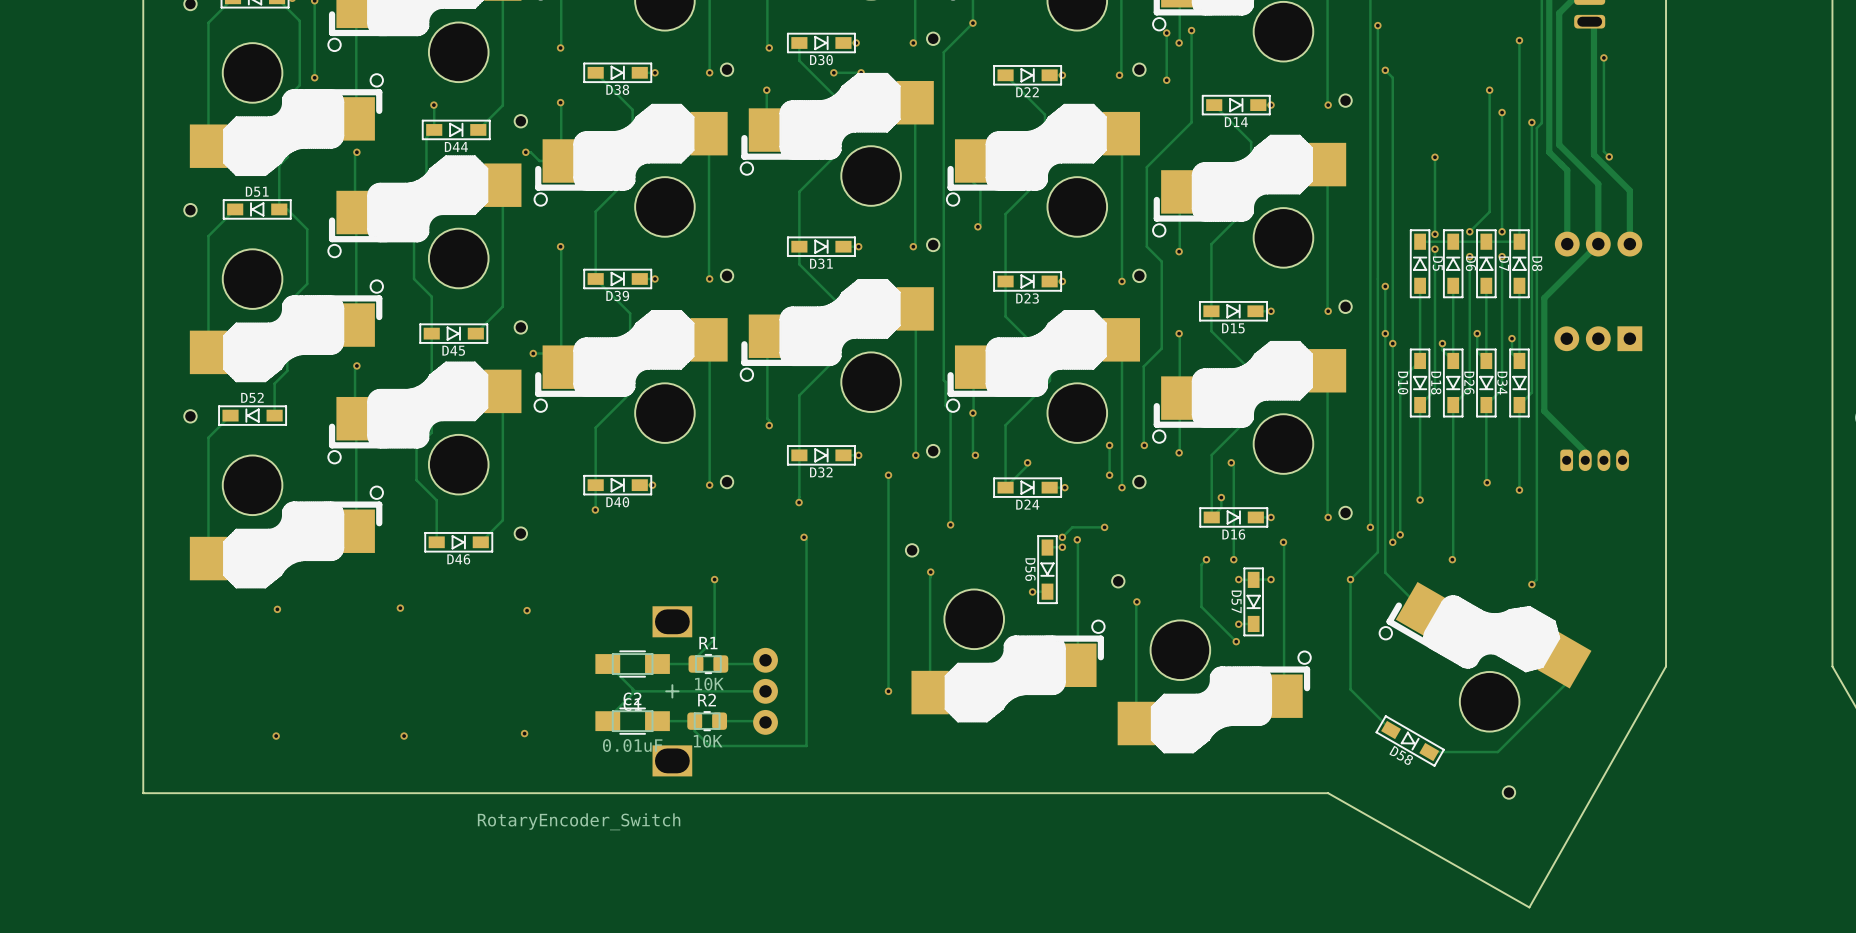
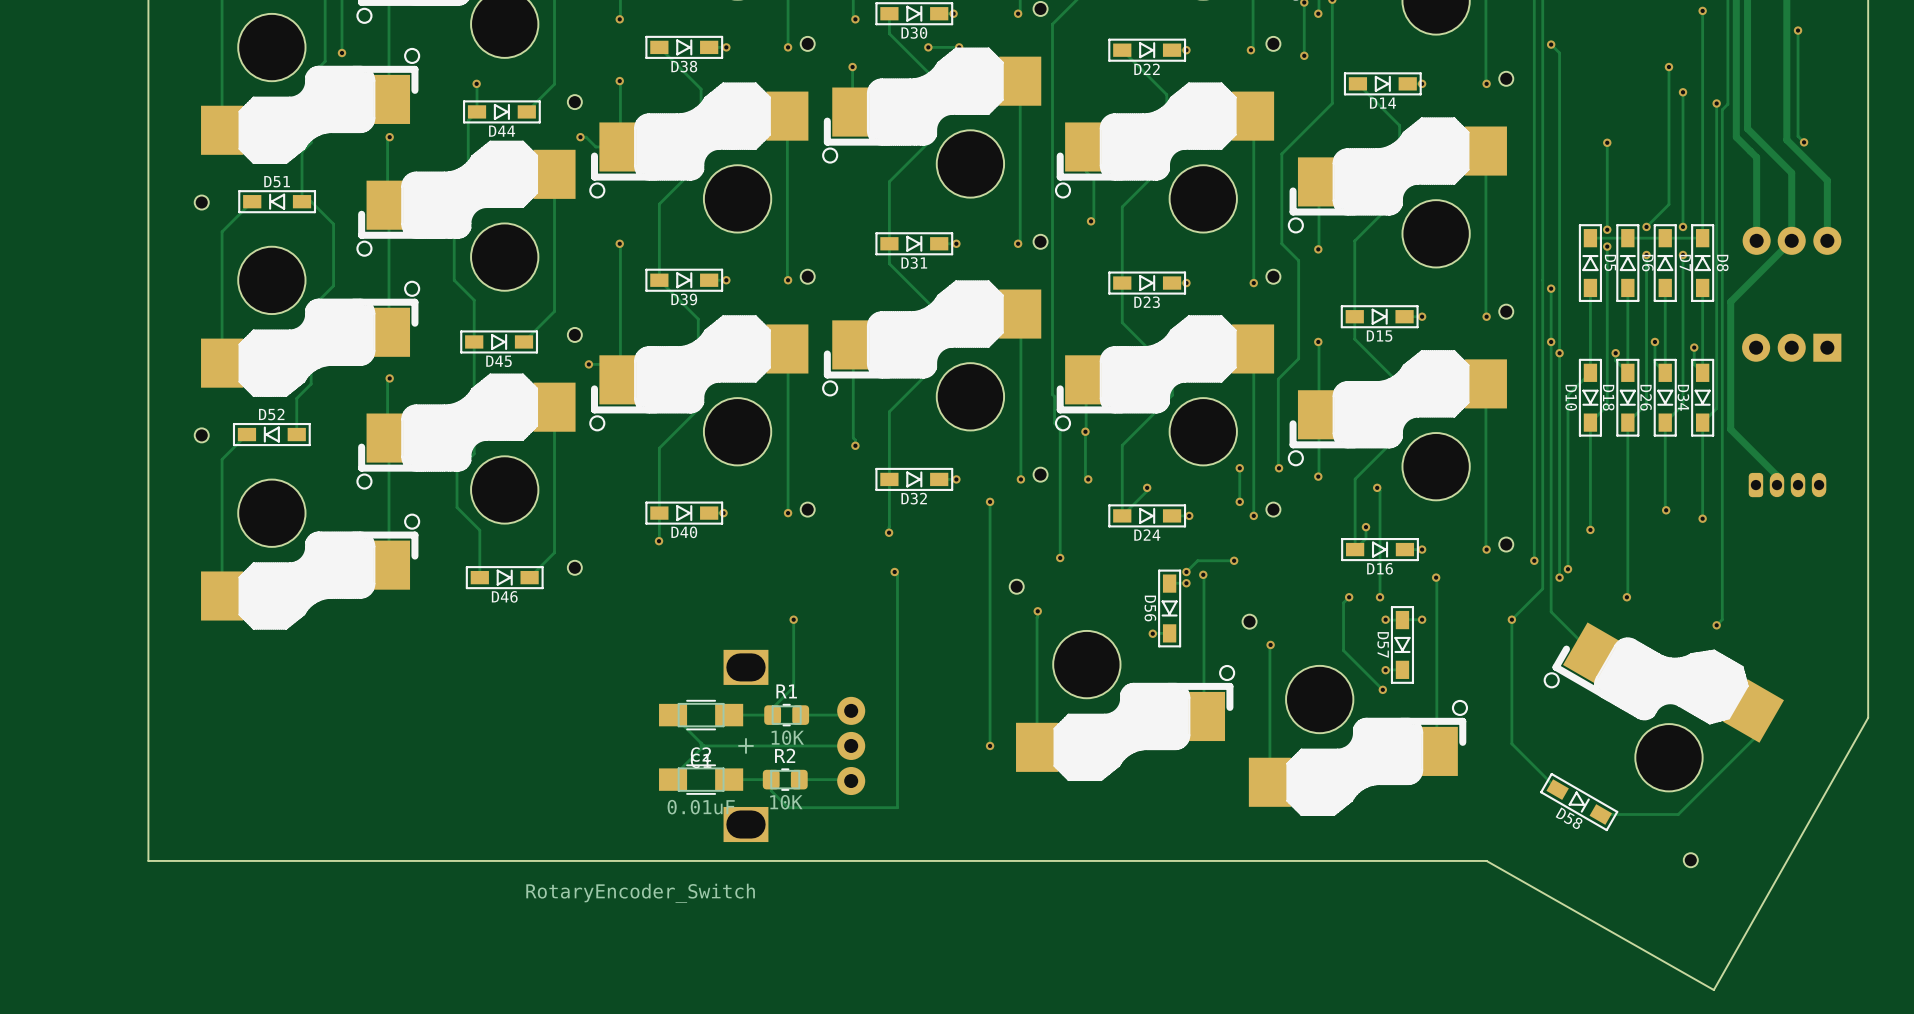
via: (400, 608) -> none
via: (277, 609) -> none
via: (527, 610) -> none
via: (524, 733) -> none
via: (276, 736) -> none
via: (404, 736) -> none

